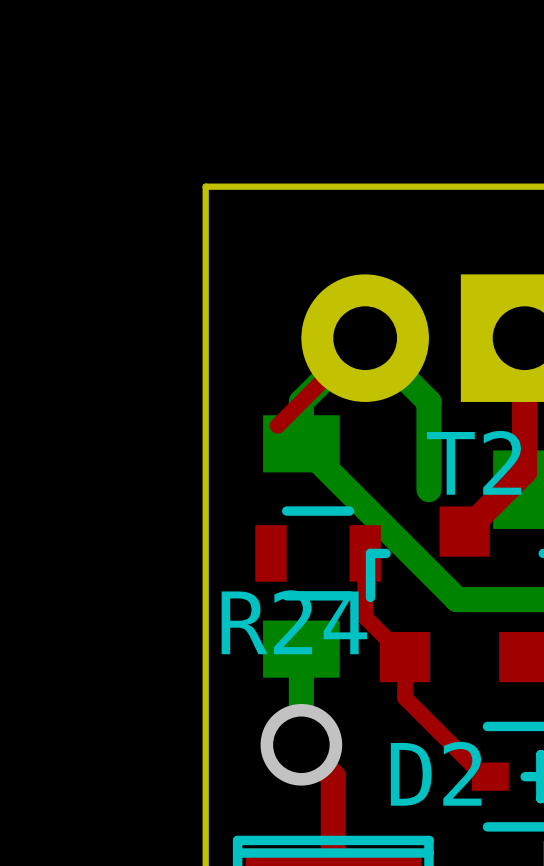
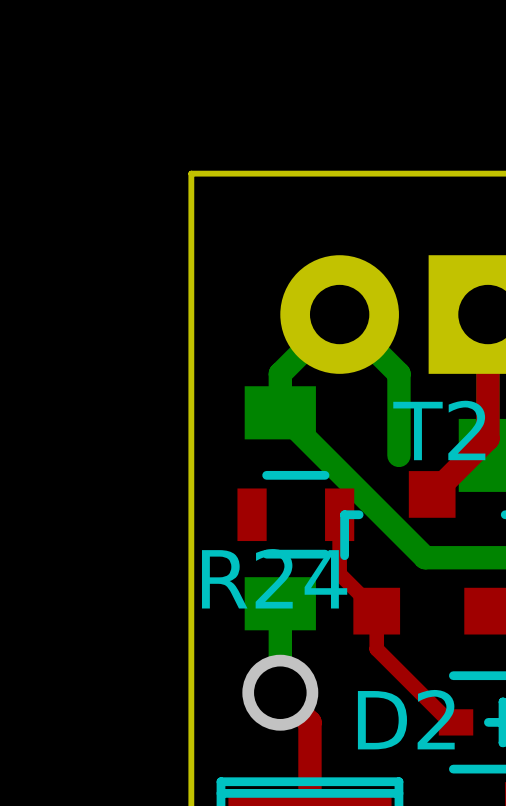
top track: (365, 338) (277, 425) -> none

